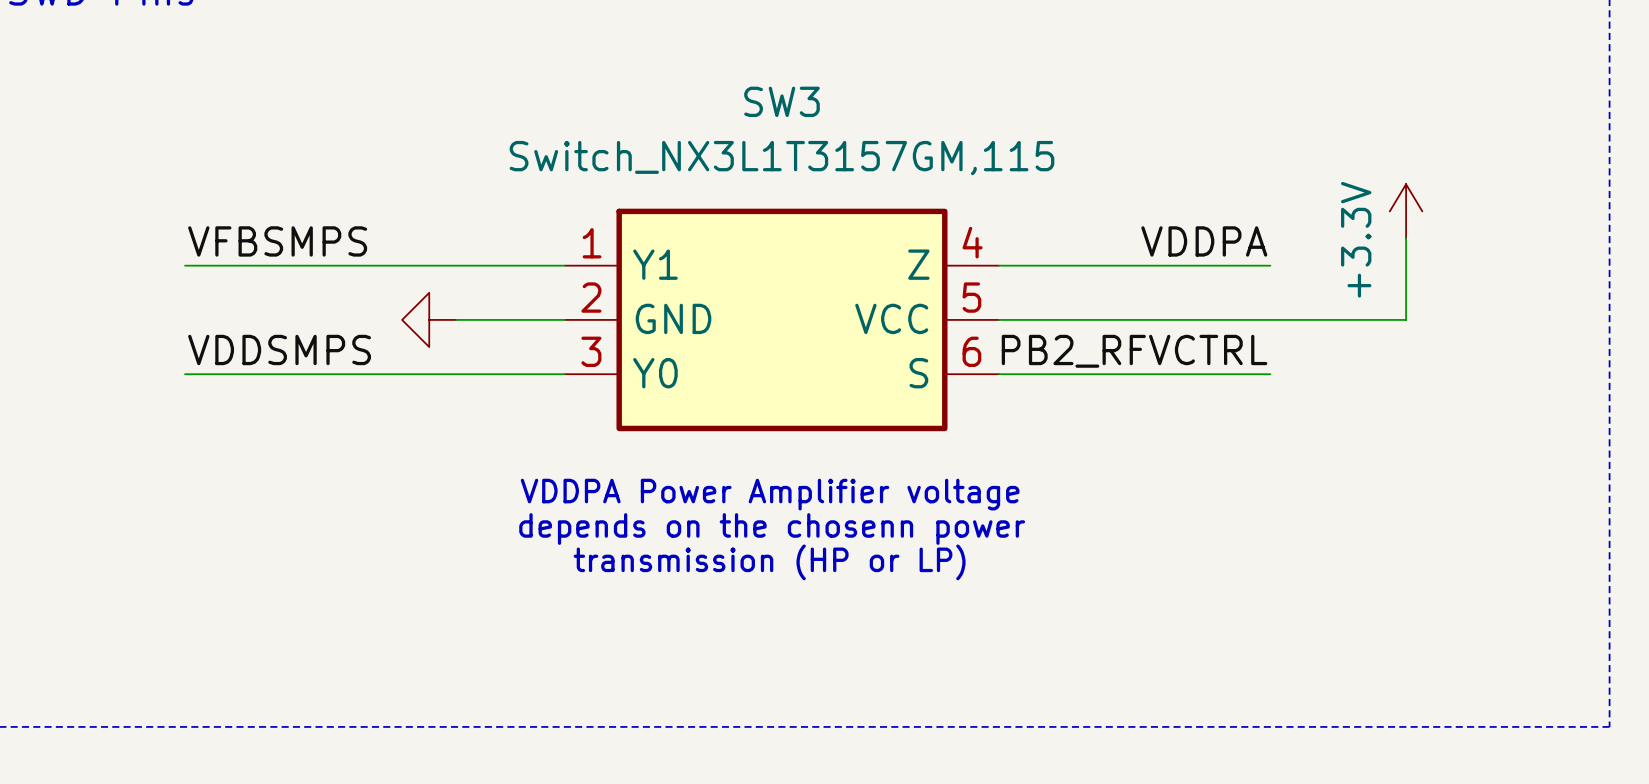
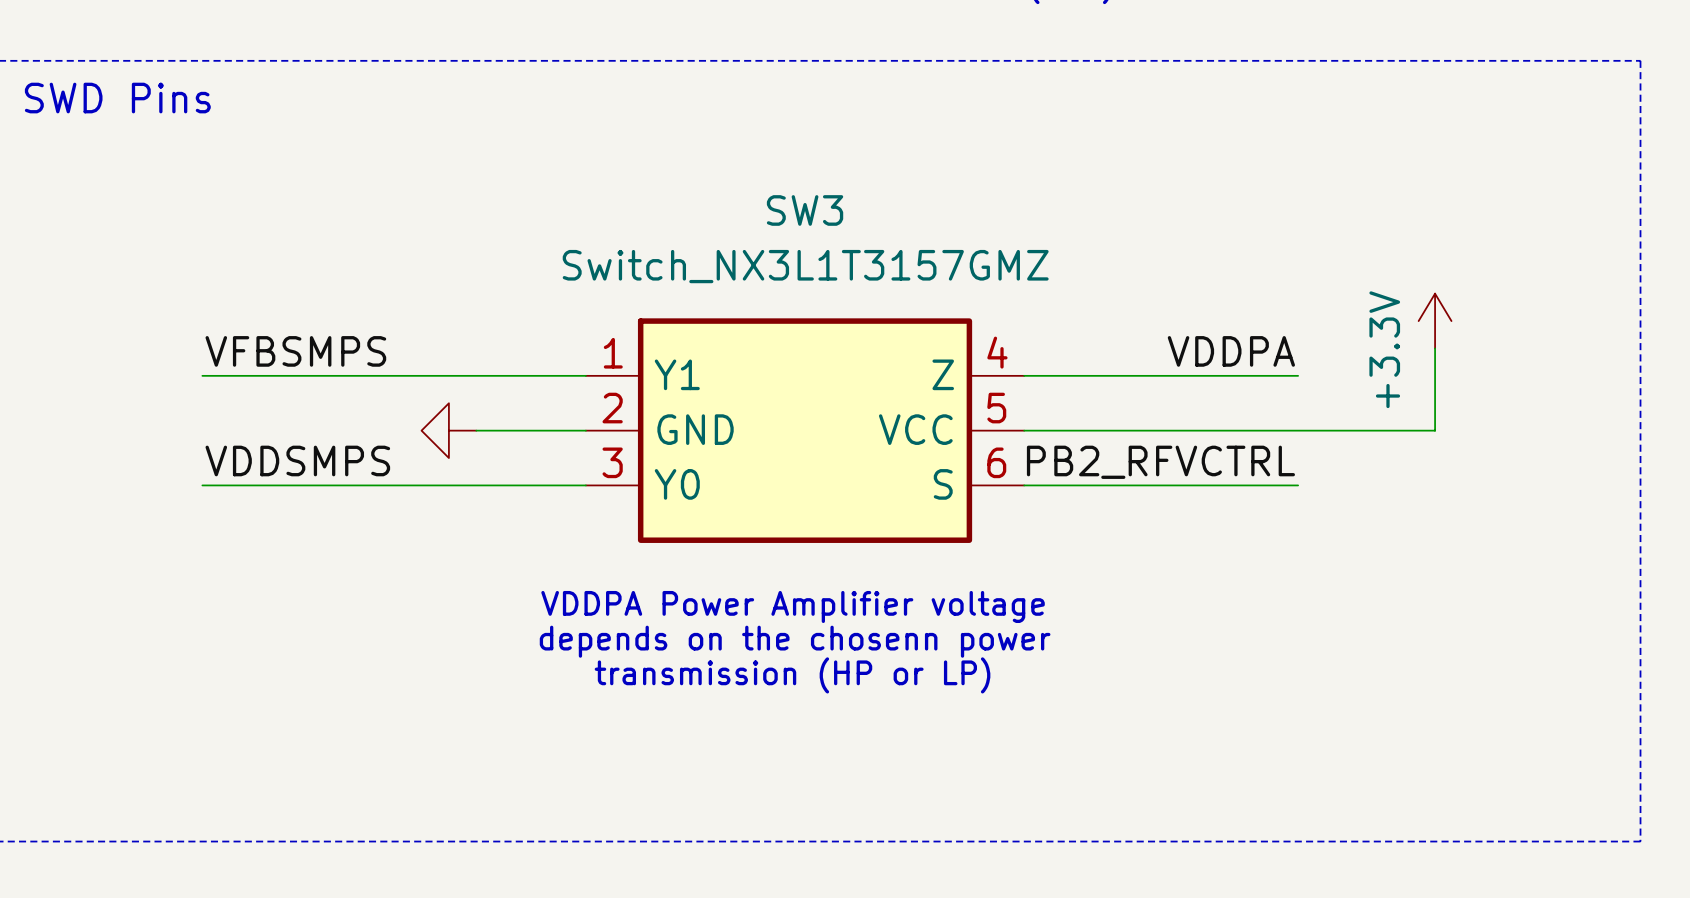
SW3 value: Switch_NX3L1T3157GM,115 (781, 158) -> Switch_NX3L1T3157GMZ (805, 266)

